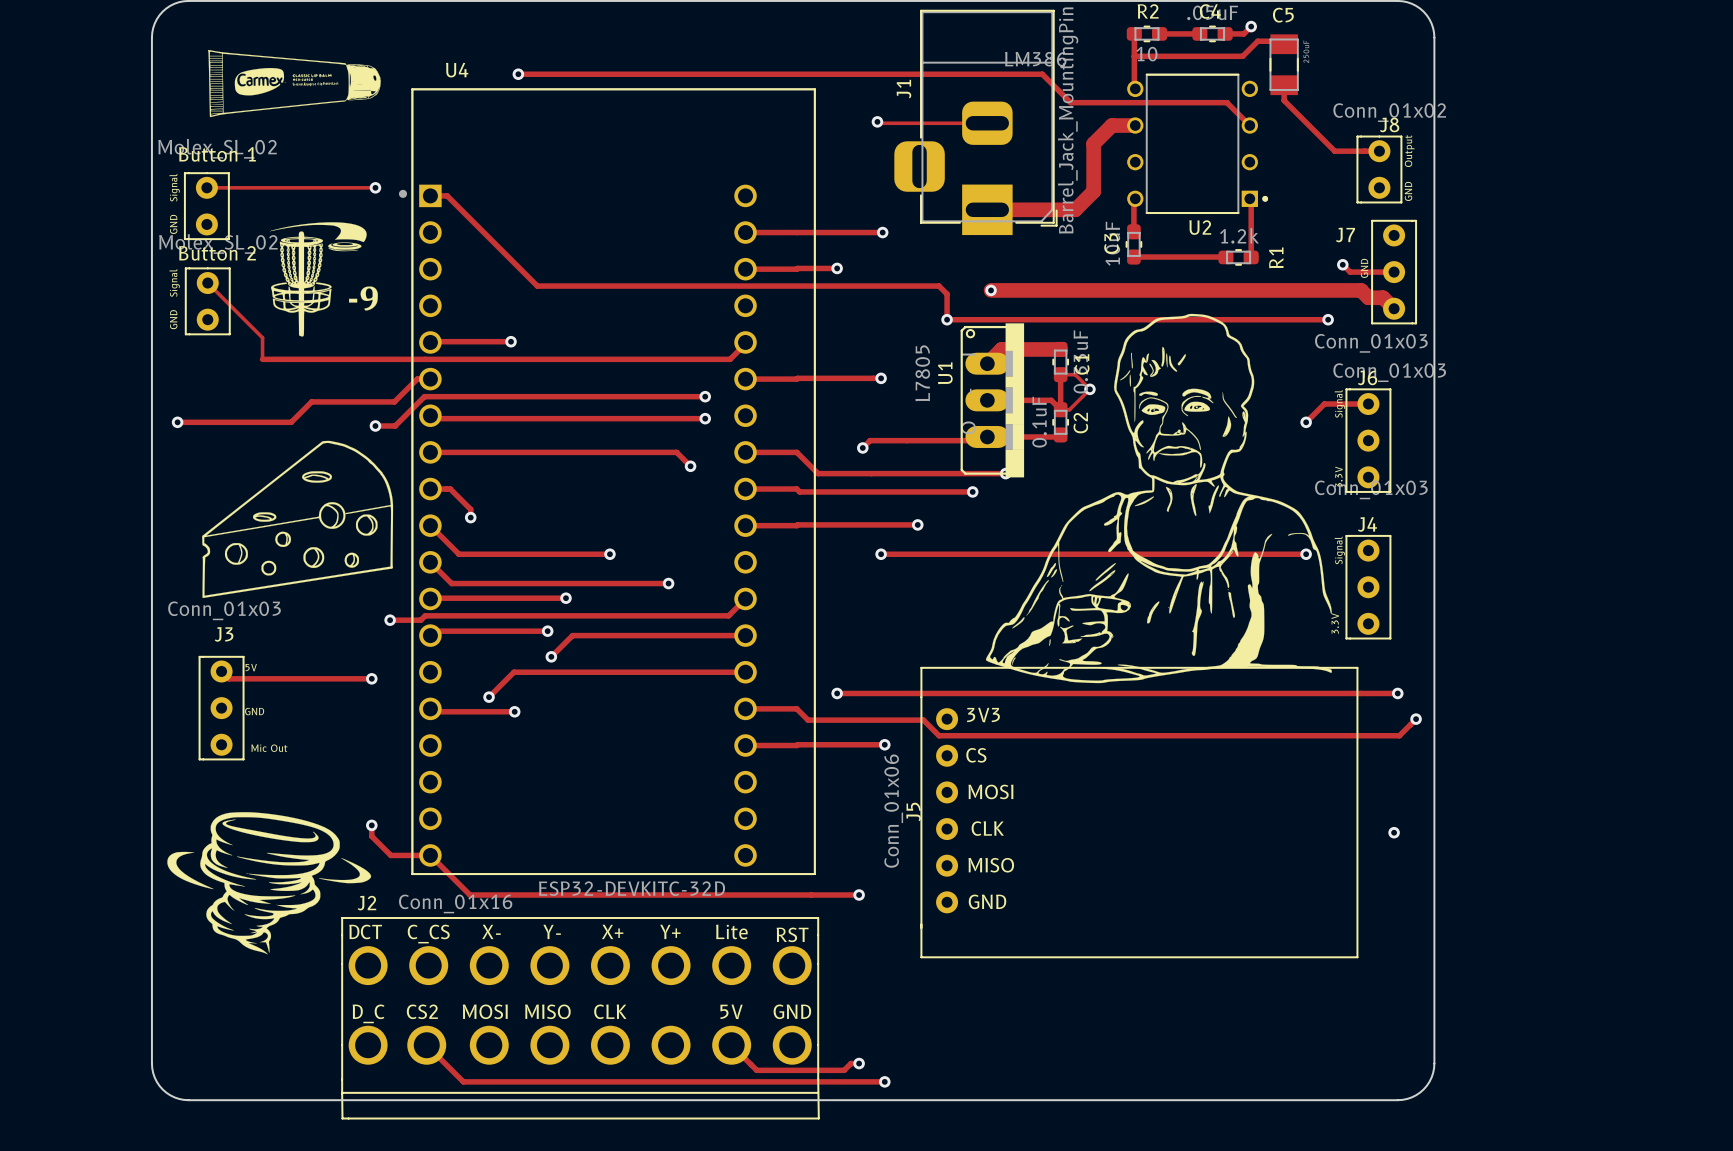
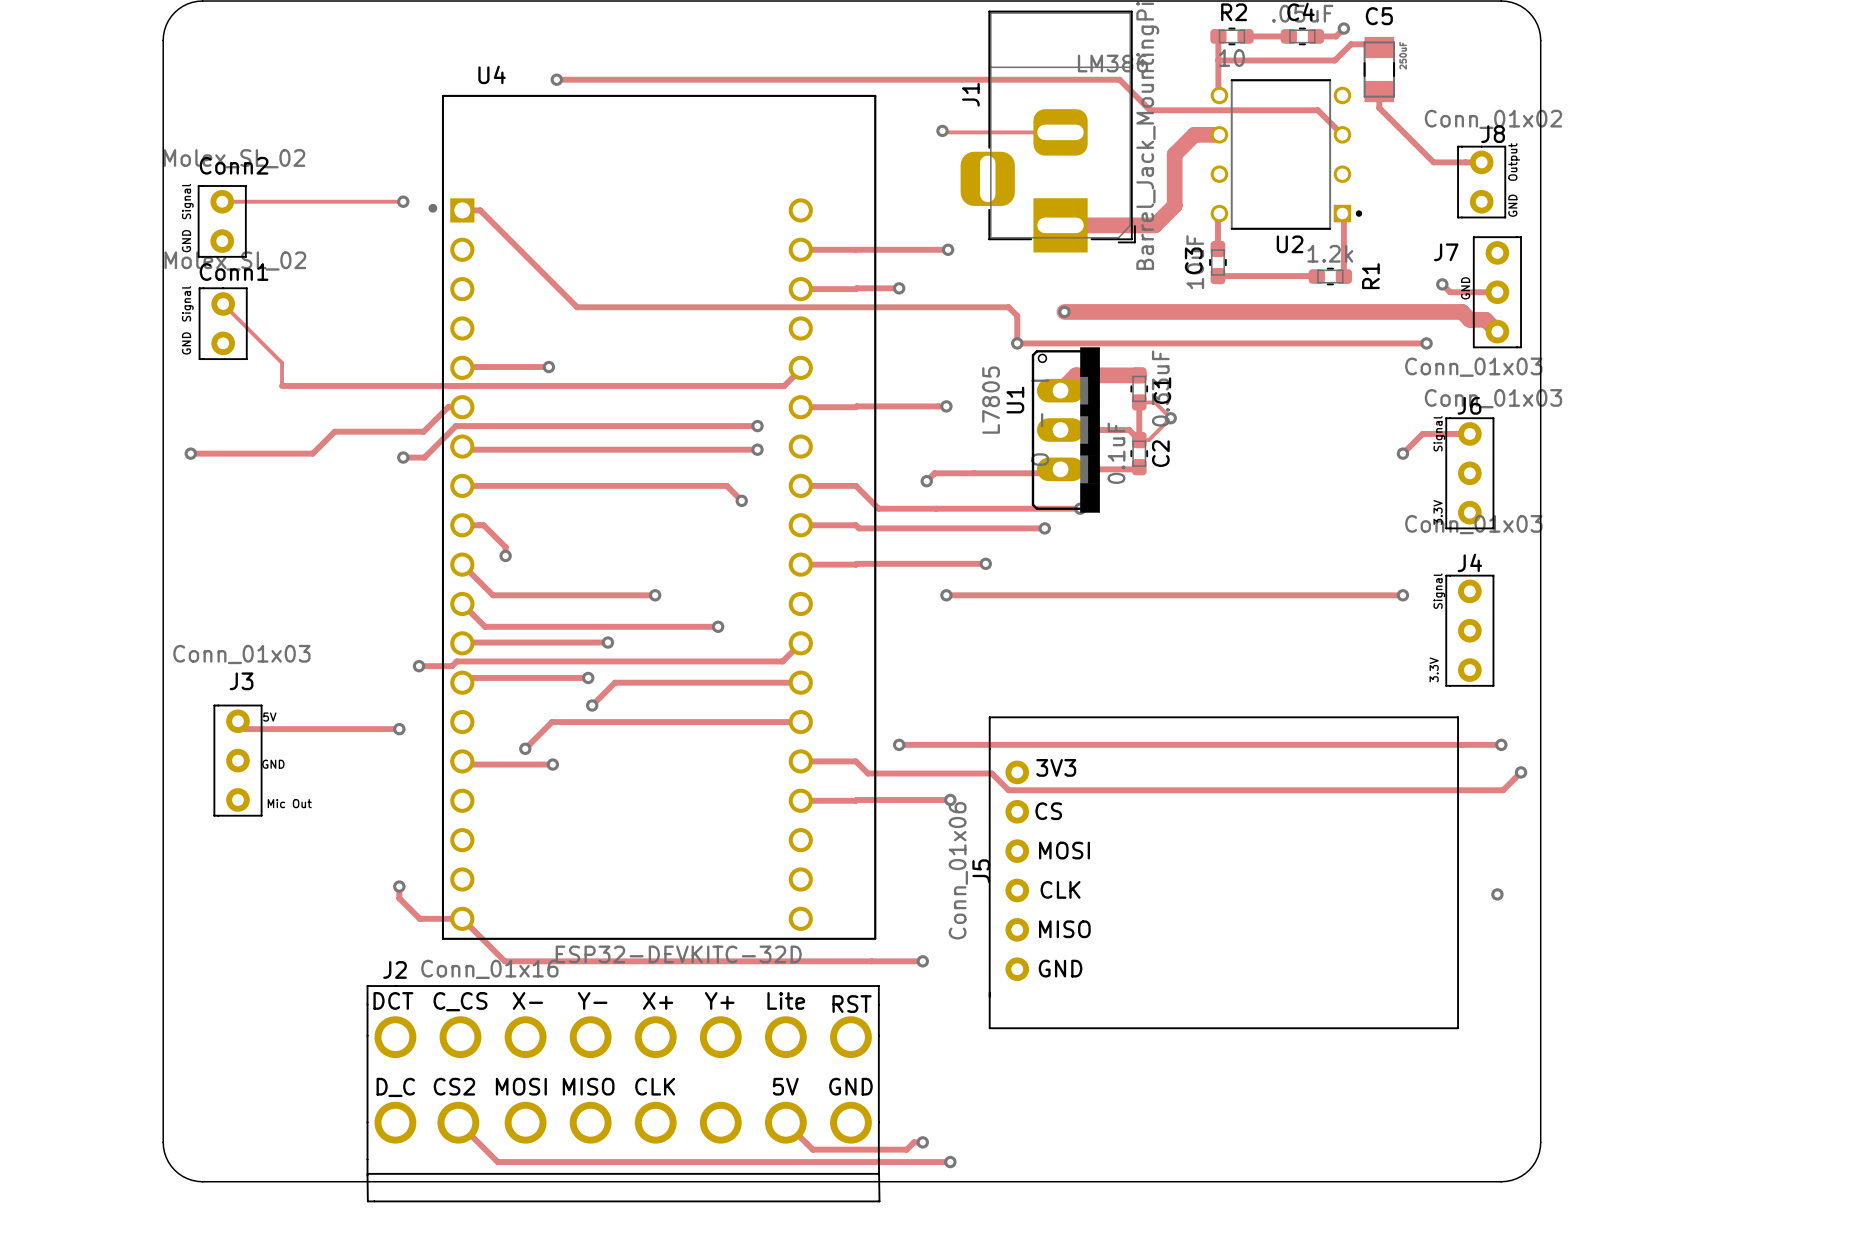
drawing: [207, 49, 381, 118] -> none
Button 1 name: Button 1 (217, 154) -> Conn2 (234, 165)
drawing: [269, 222, 378, 337] -> none
Button 2 name: Button 2 (217, 253) -> Conn1 (234, 272)
drawing: [985, 313, 1332, 684] -> none
drawing: [202, 440, 394, 598] -> none
drawing: [167, 812, 372, 955] -> none

